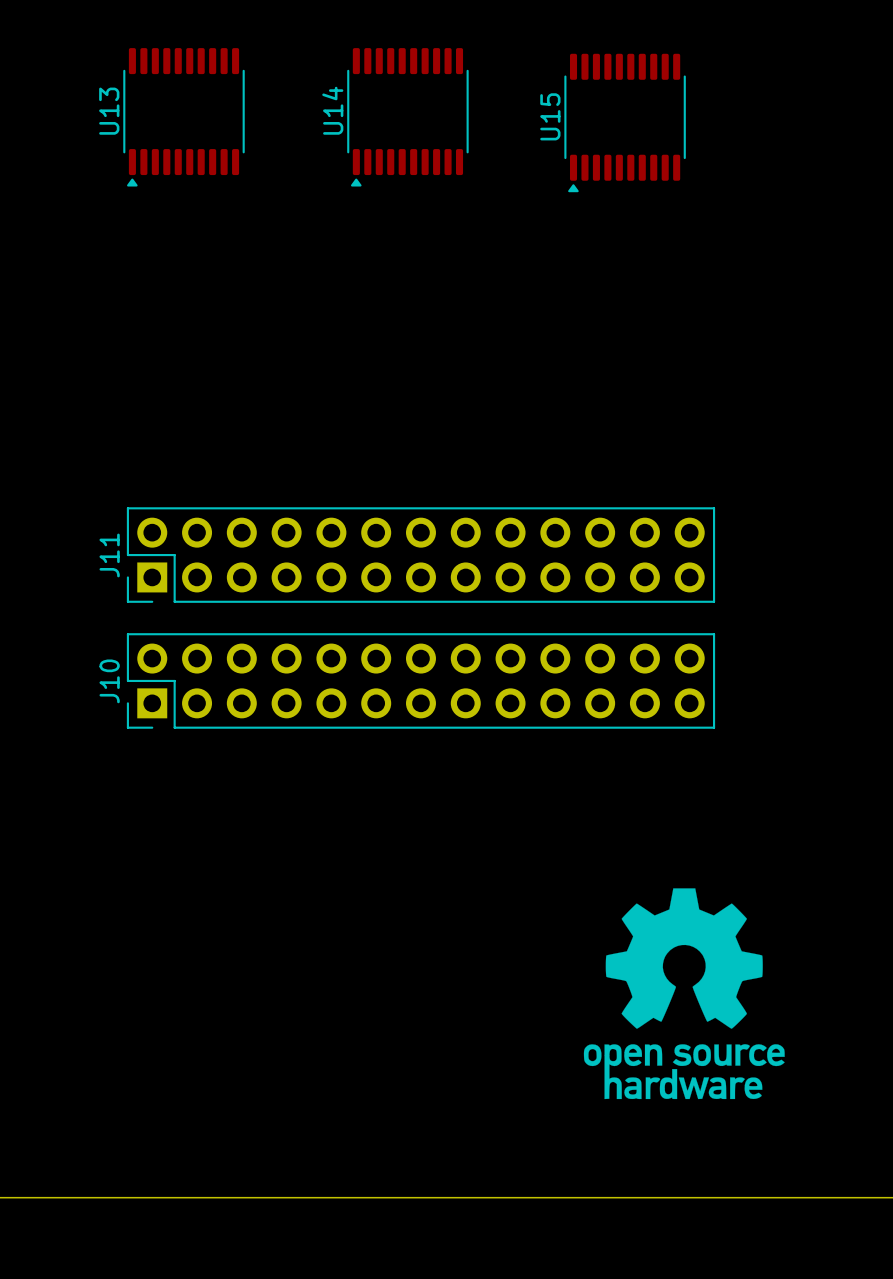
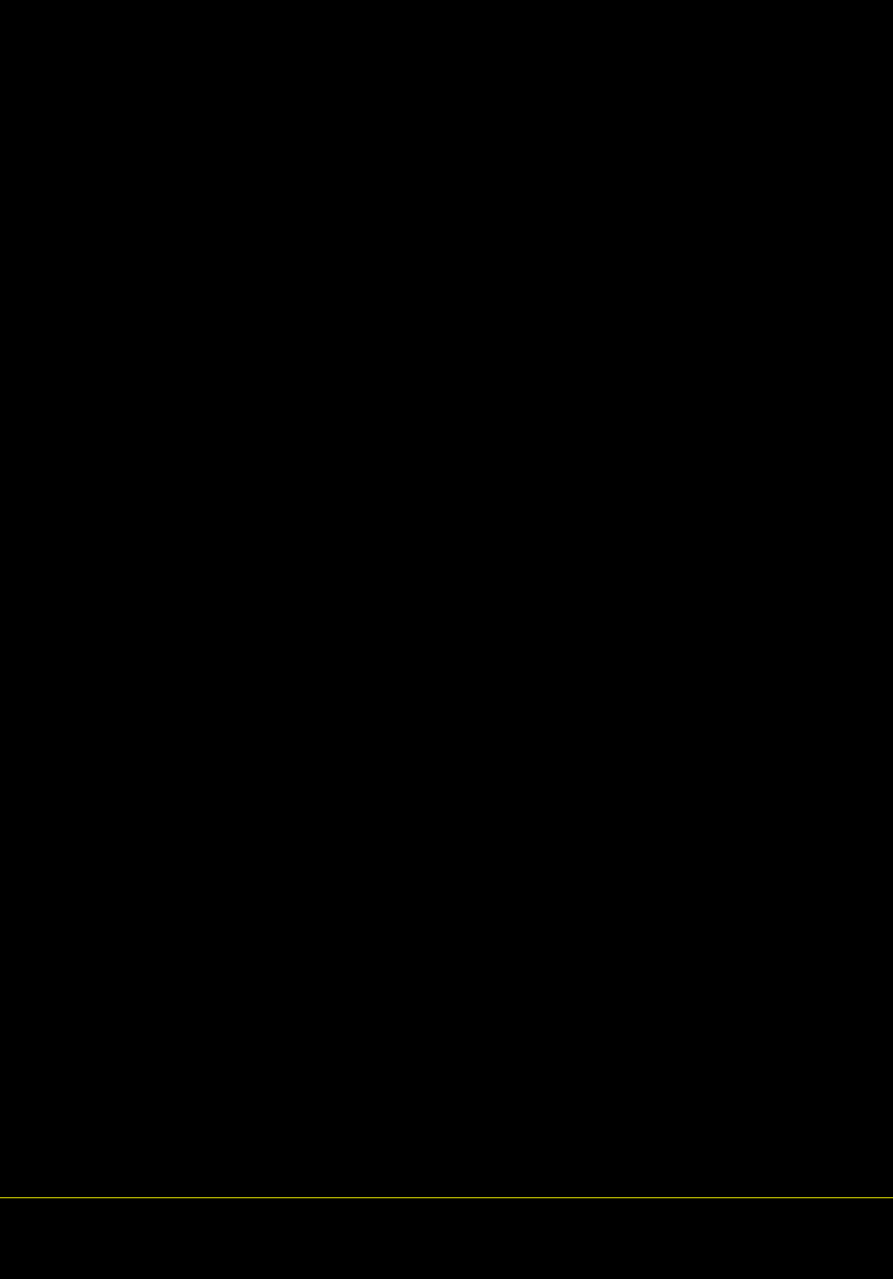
U13: (183, 117) -> none
U14: (407, 117) -> none
U15: (625, 122) -> none
J11: (420, 555) -> none
J10: (420, 680) -> none
drawing: [583, 888, 785, 1100] -> none

